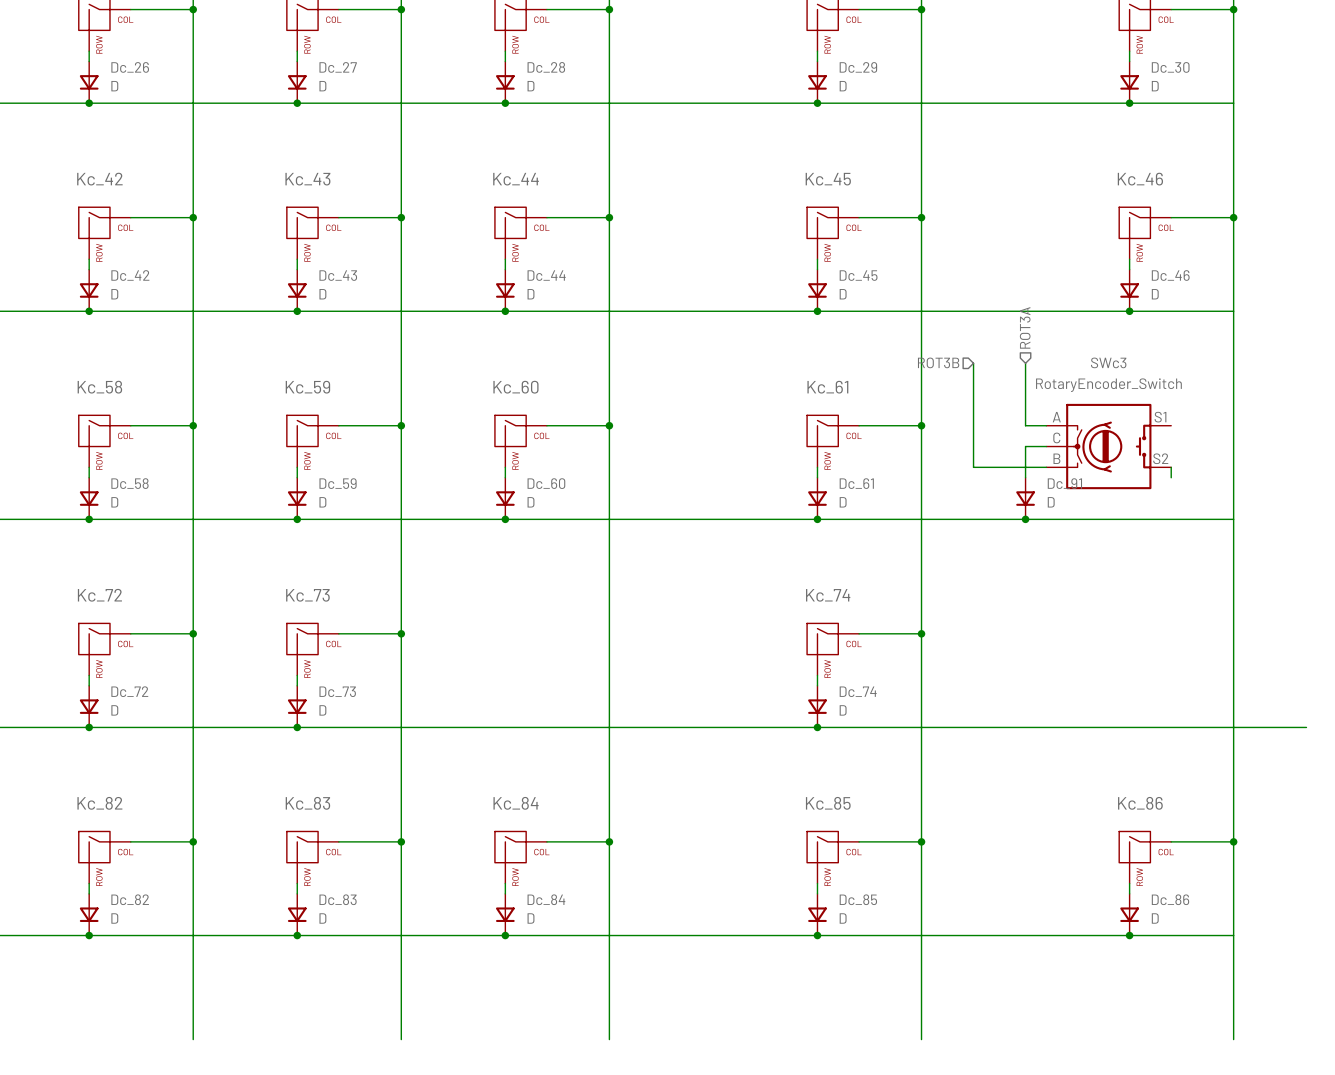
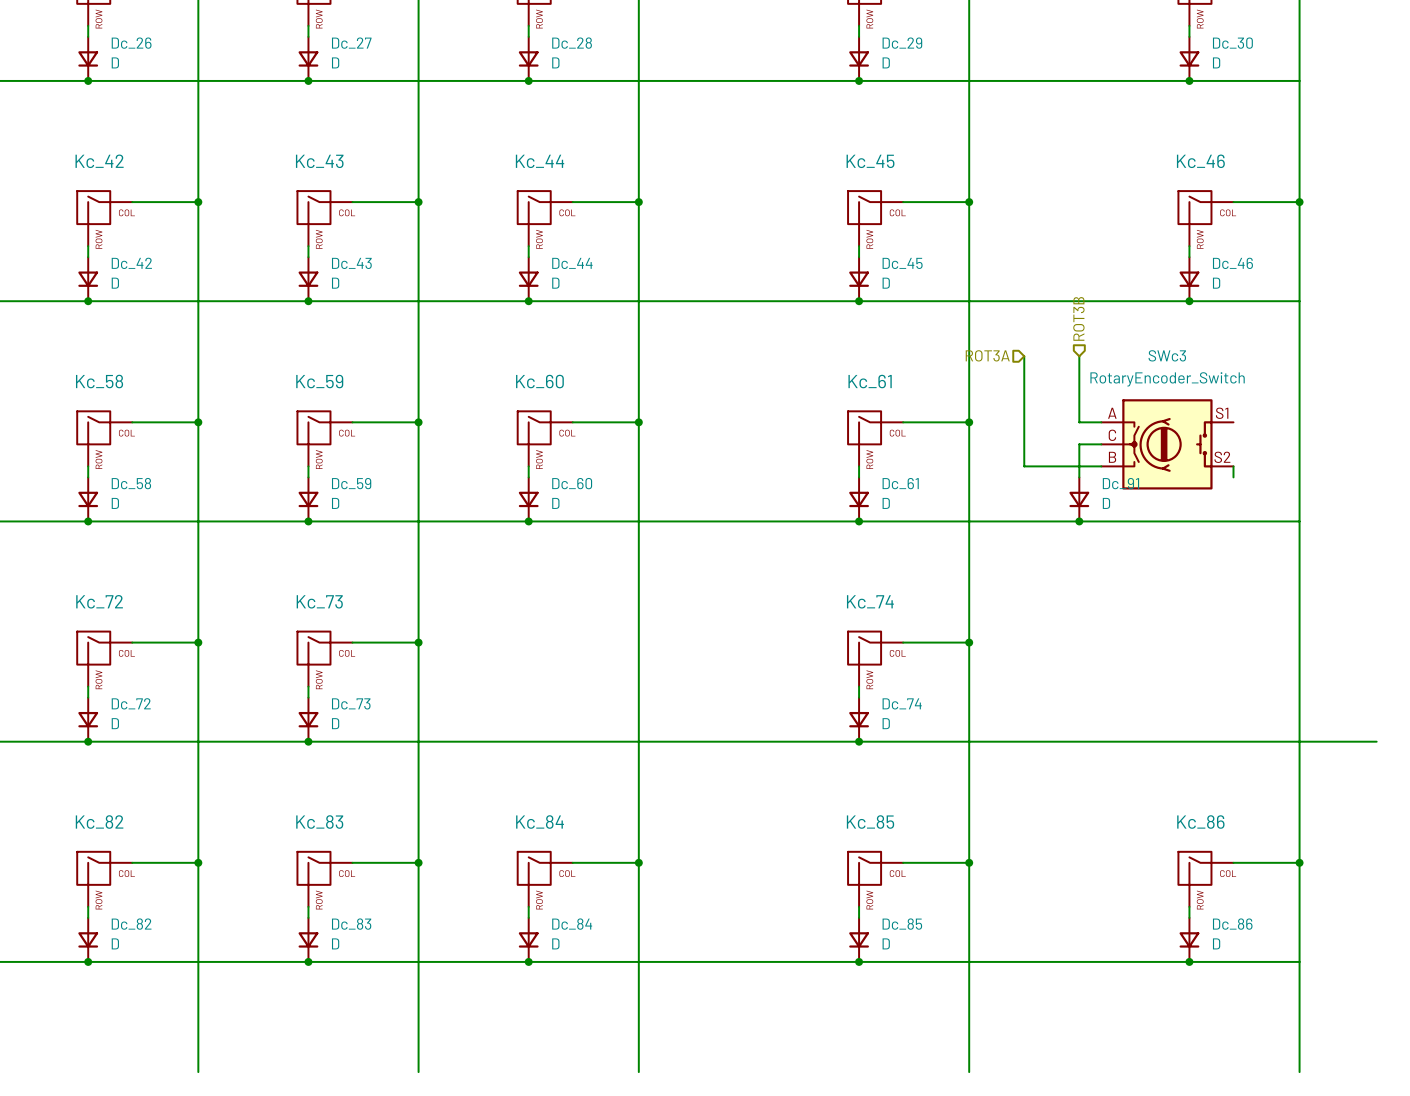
hierarchical label: ROT3A (1025, 327) -> ROT3B (1078, 318)
hierarchical label: ROT3B (938, 362) -> ROT3A (987, 355)

